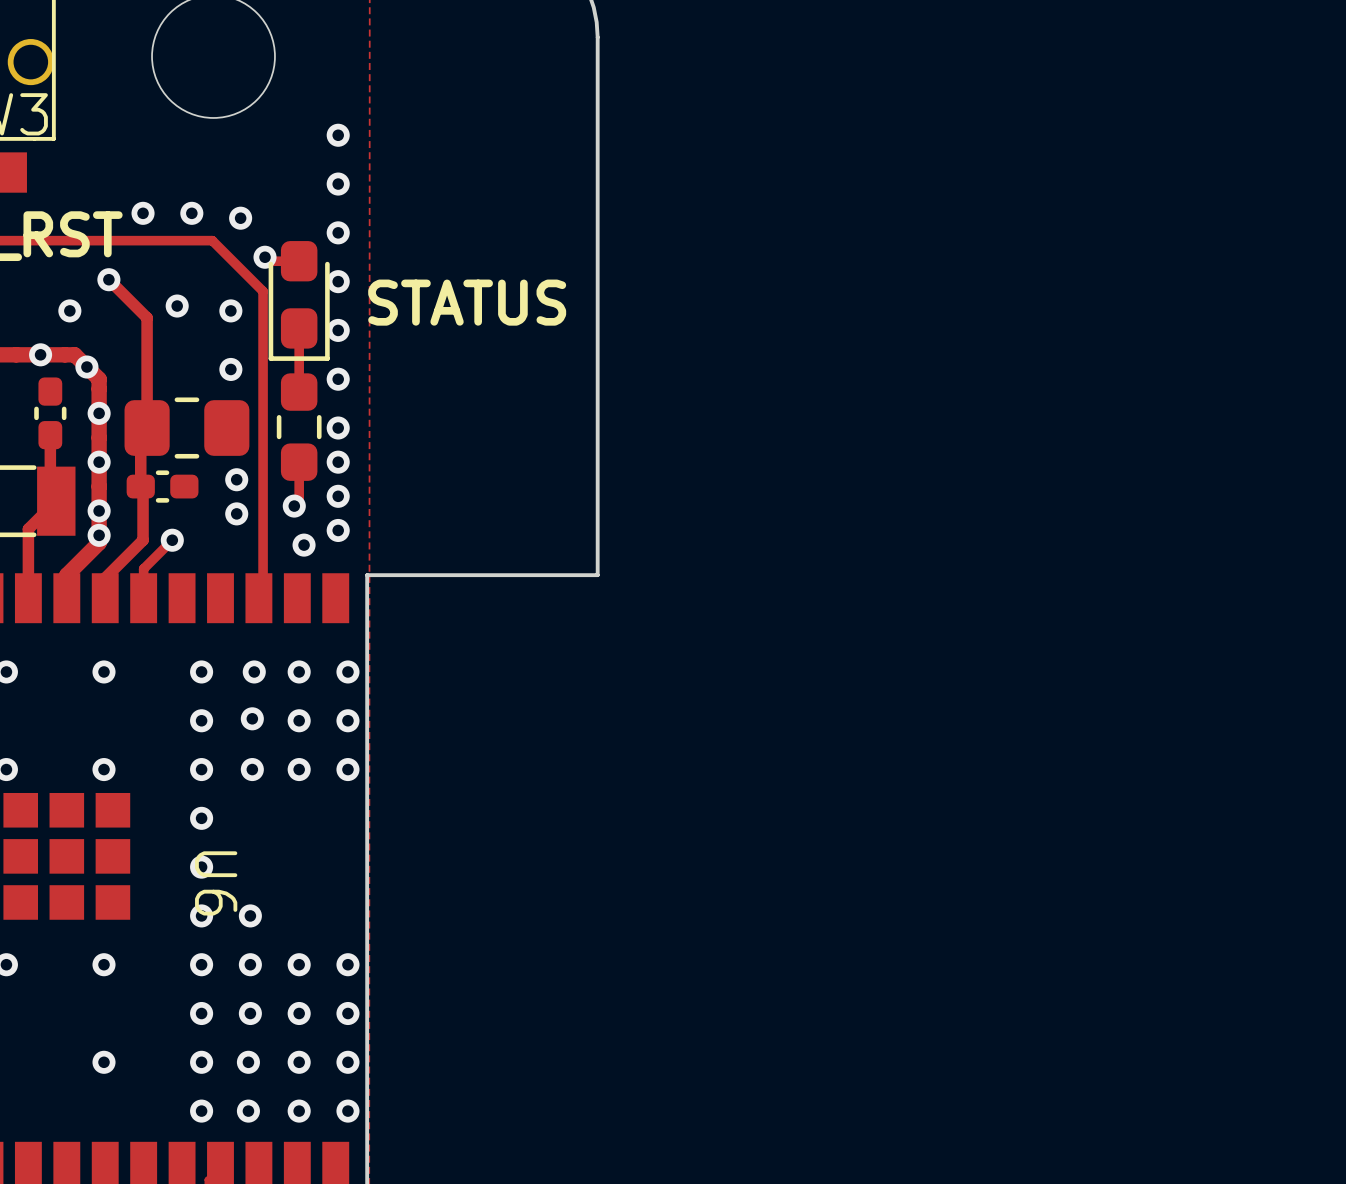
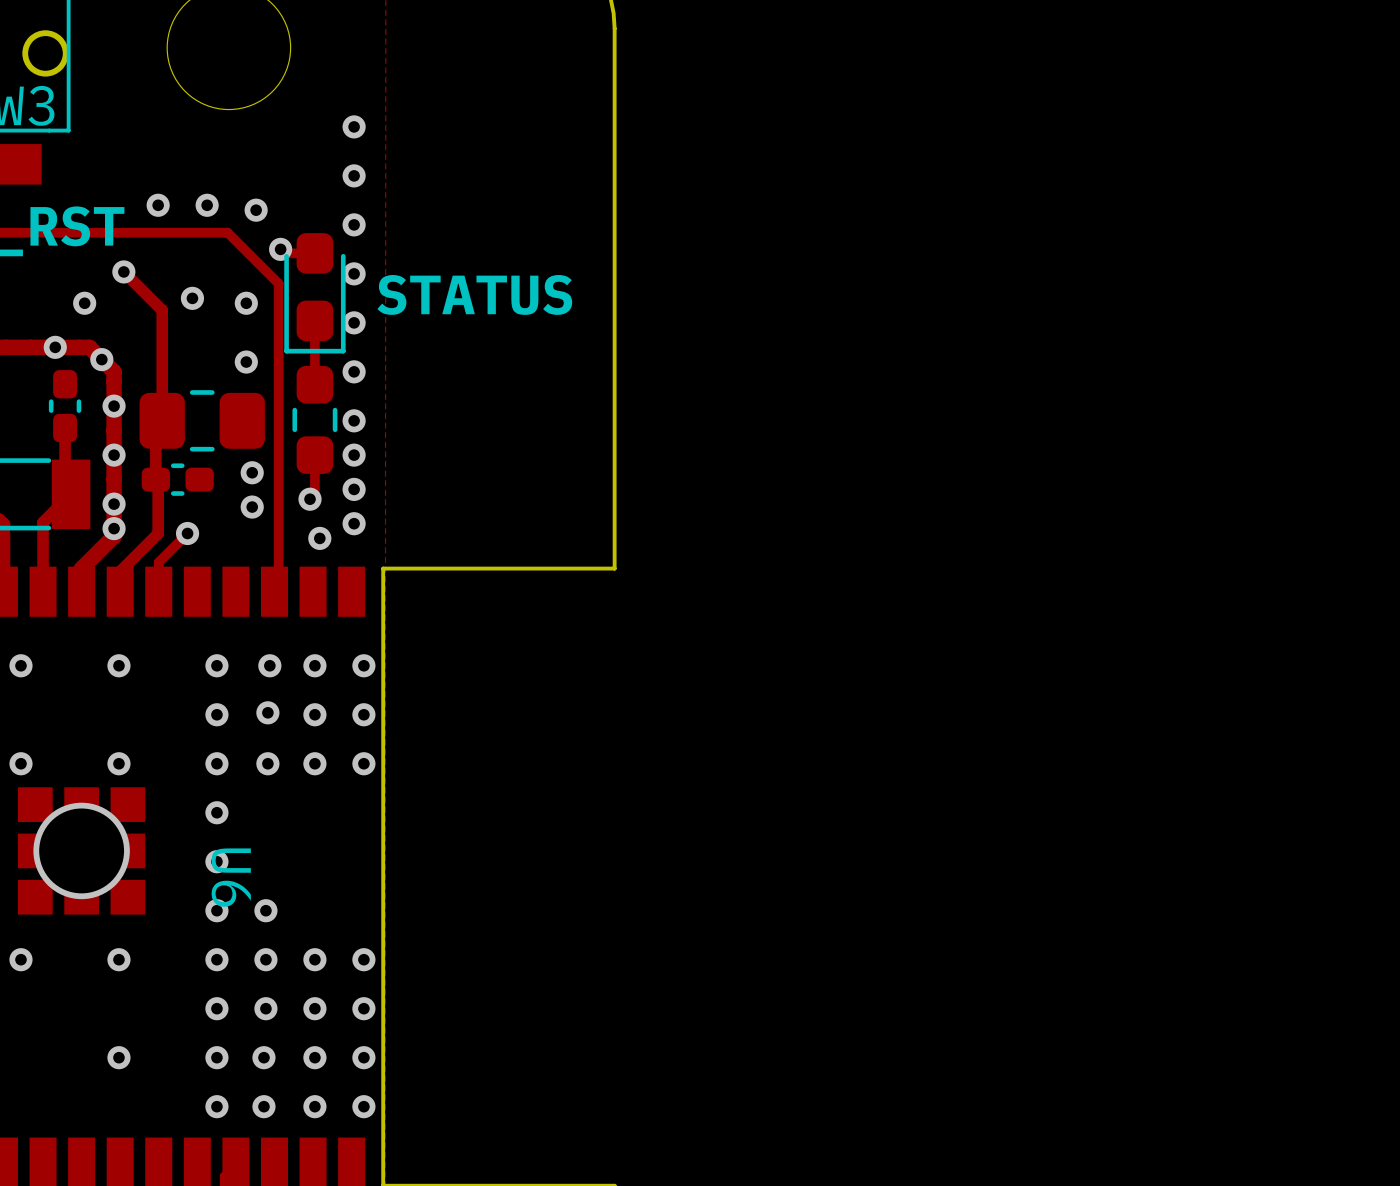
via: none -> (81, 850)

